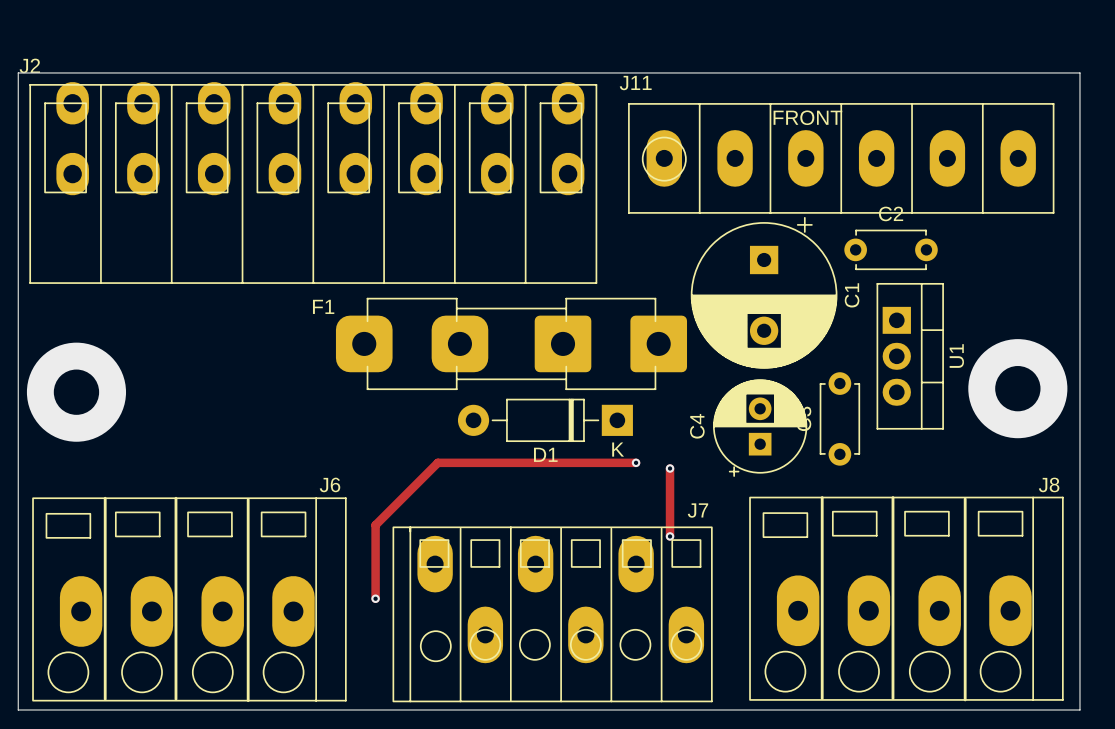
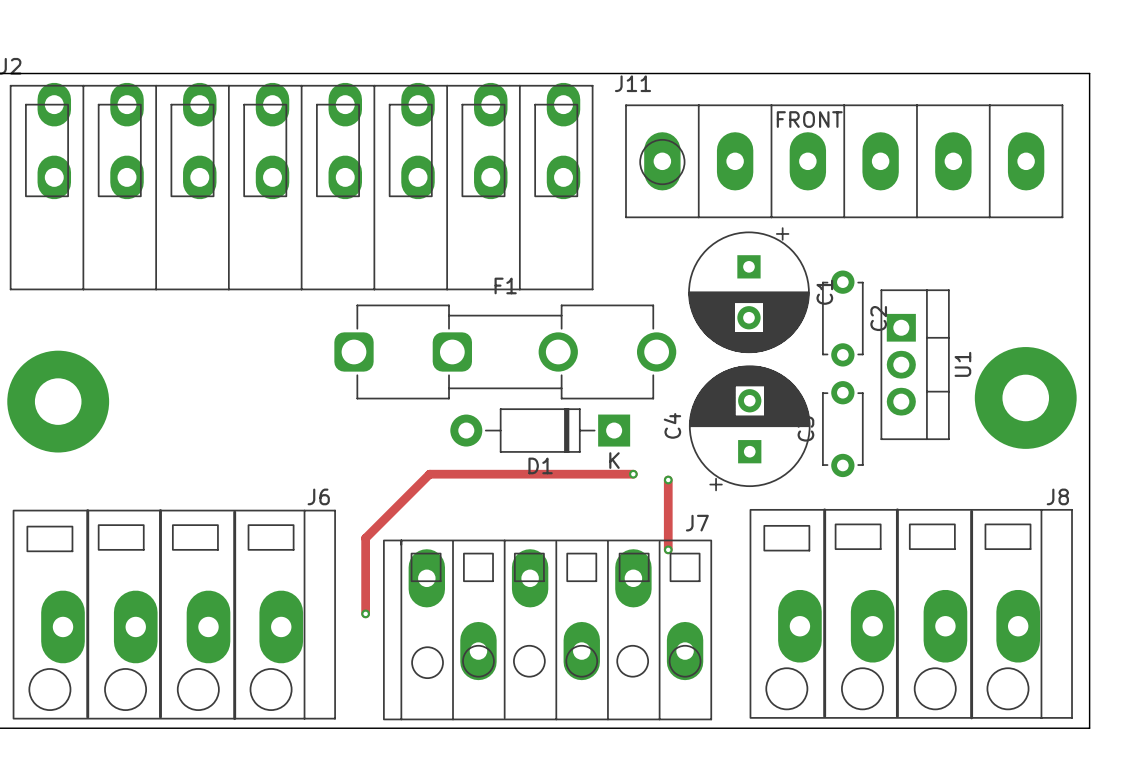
C1 footprint: [690, 216, 838, 369] -> [688, 227, 810, 354]
C2 rotation: 0° (891, 249) -> 90° clockwise (842, 318)
C2 position: (891, 249) -> (842, 318)
F1 footprint: [335, 297, 688, 391] -> [334, 304, 677, 400]
F1 name position: F1 (323, 306) -> F1 (505, 285)
C4 footprint: [713, 379, 808, 477] -> [688, 365, 811, 492]

